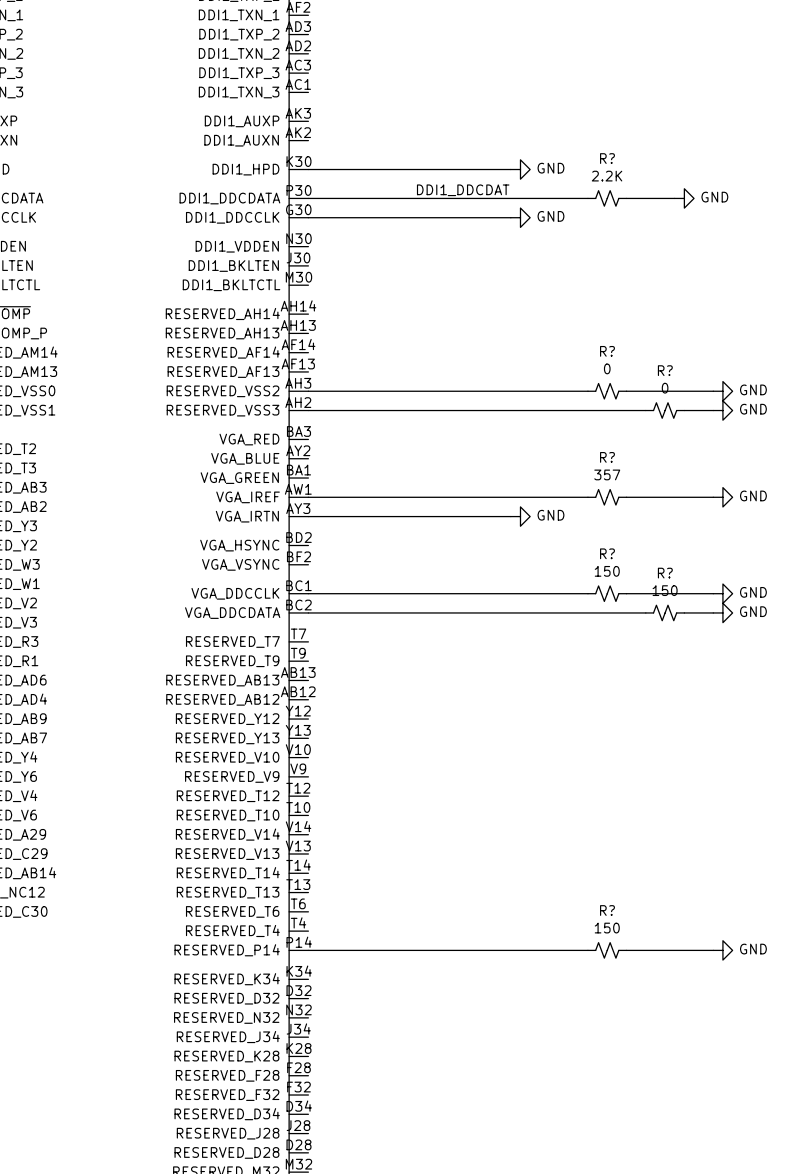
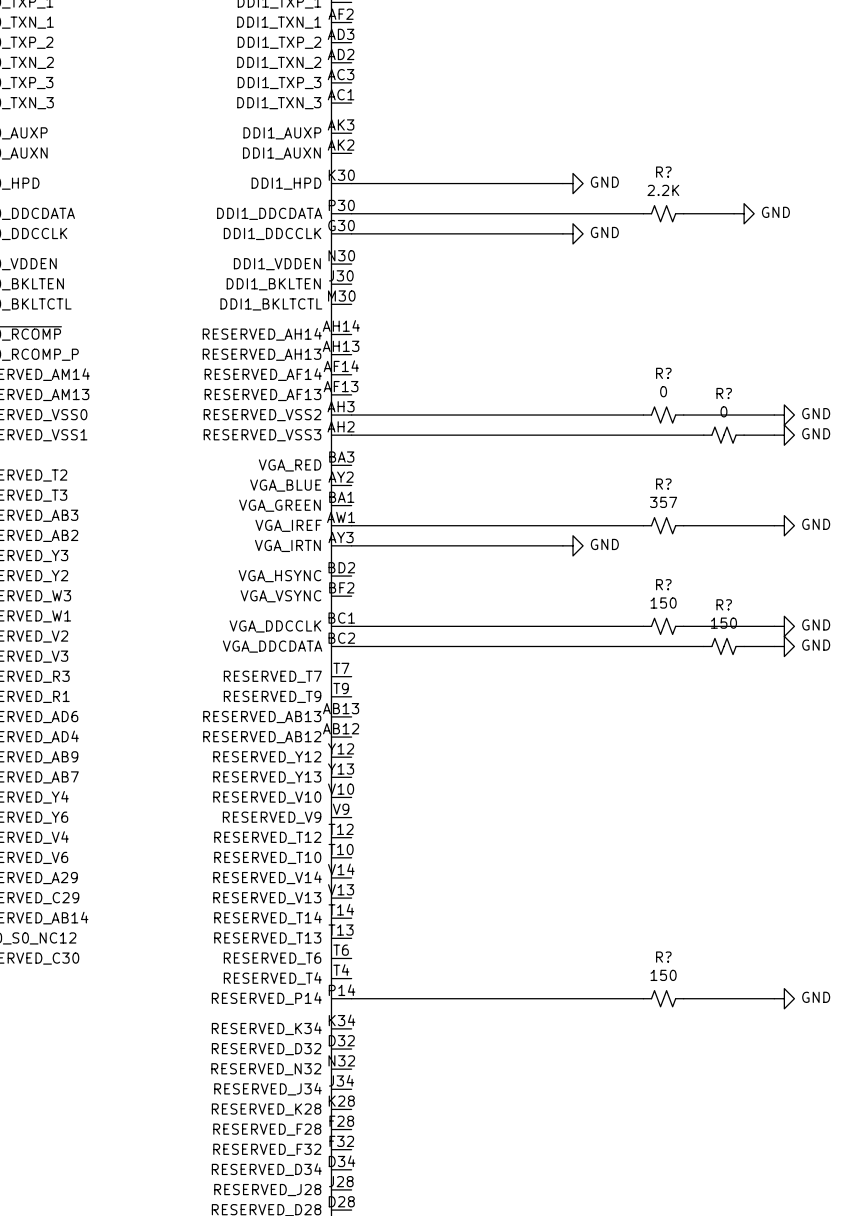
label: DDI1_DDCDAT (463, 190) -> none

